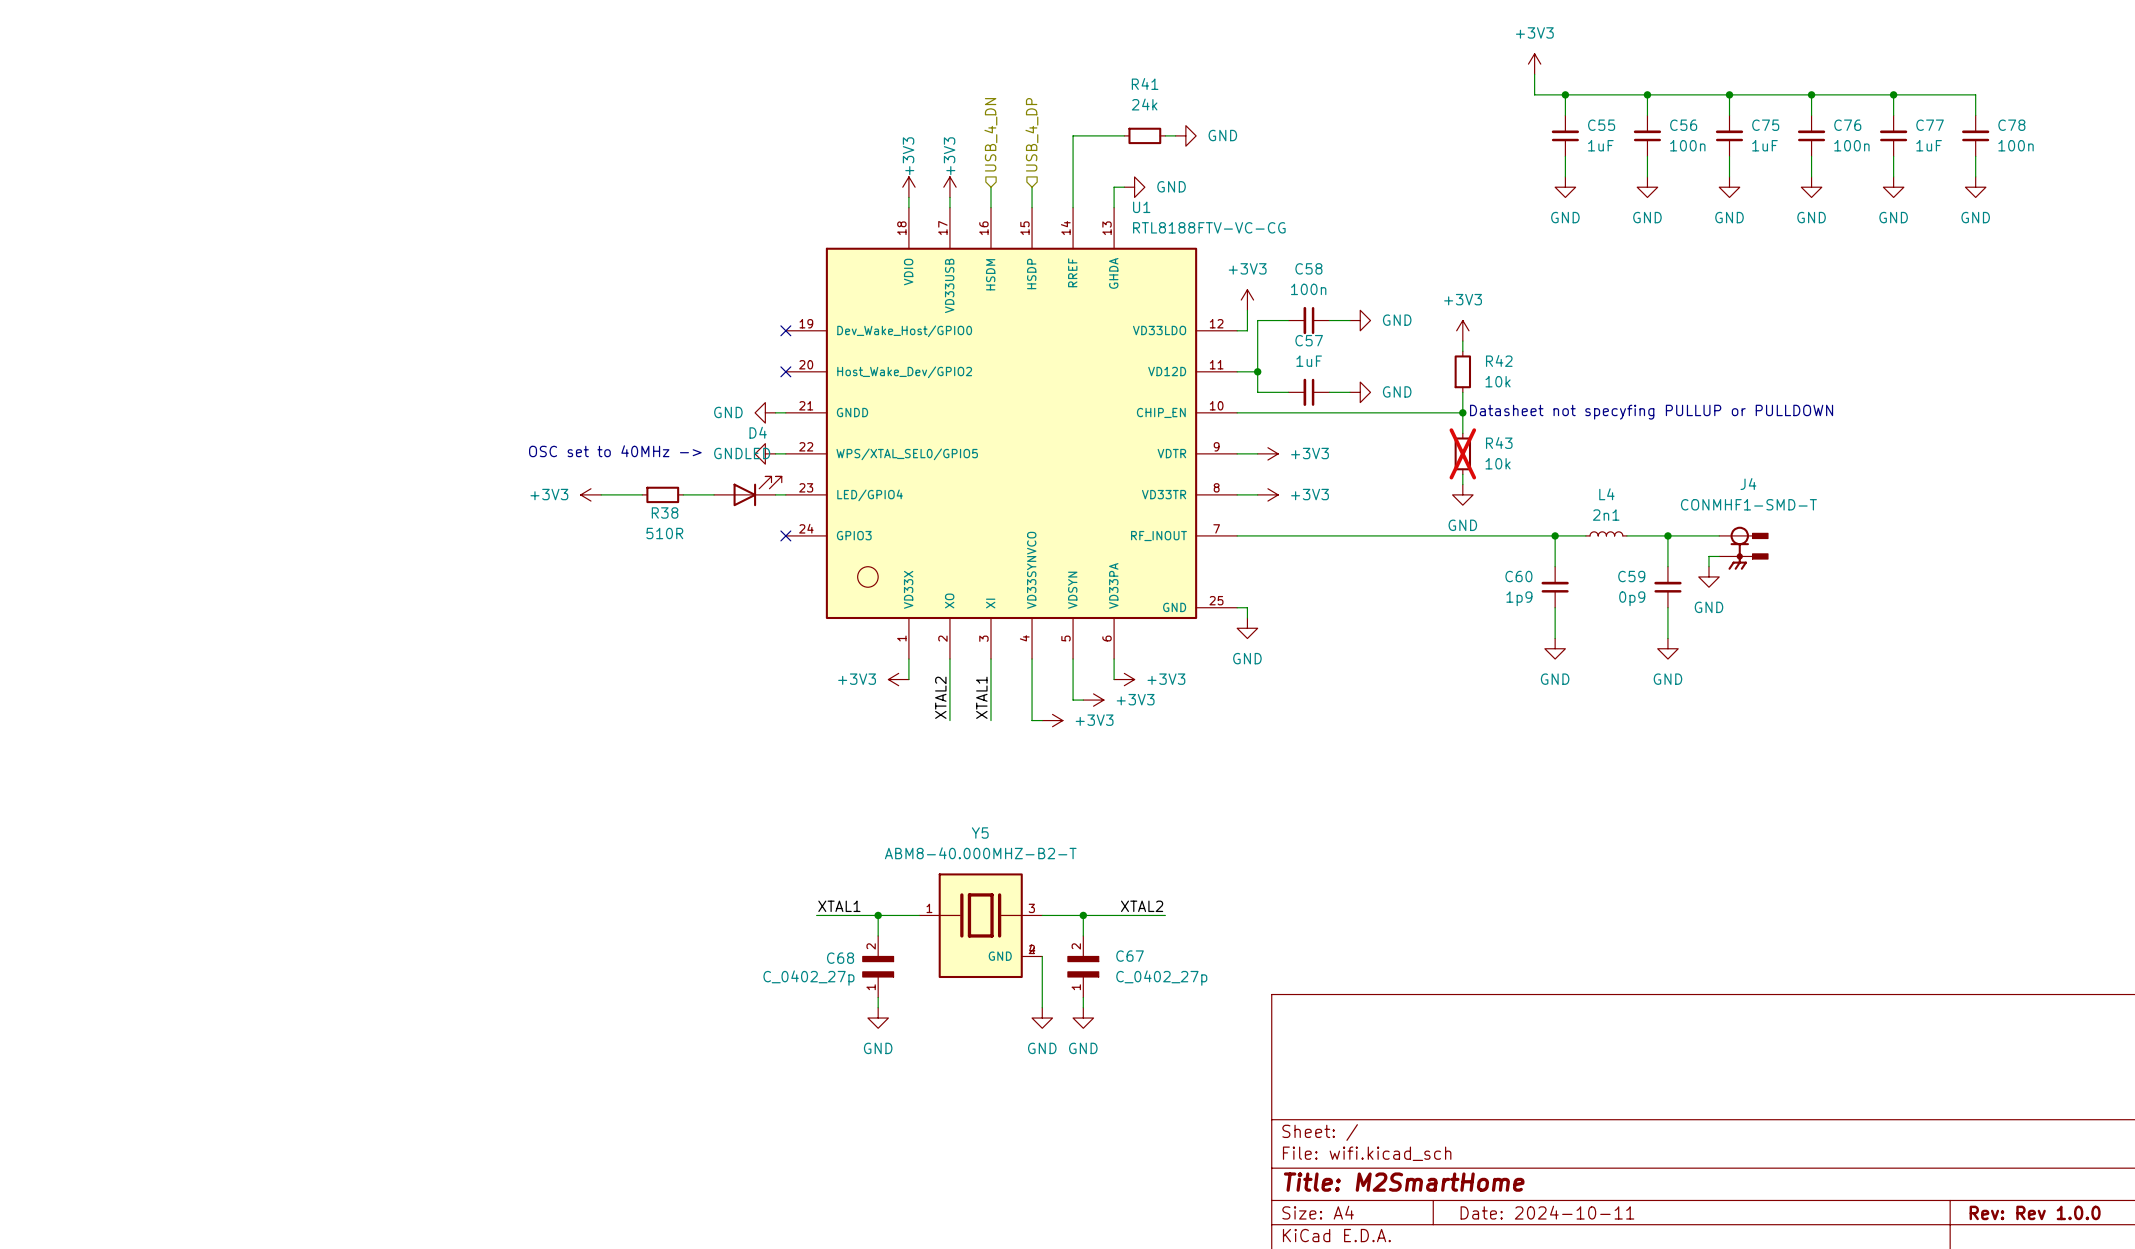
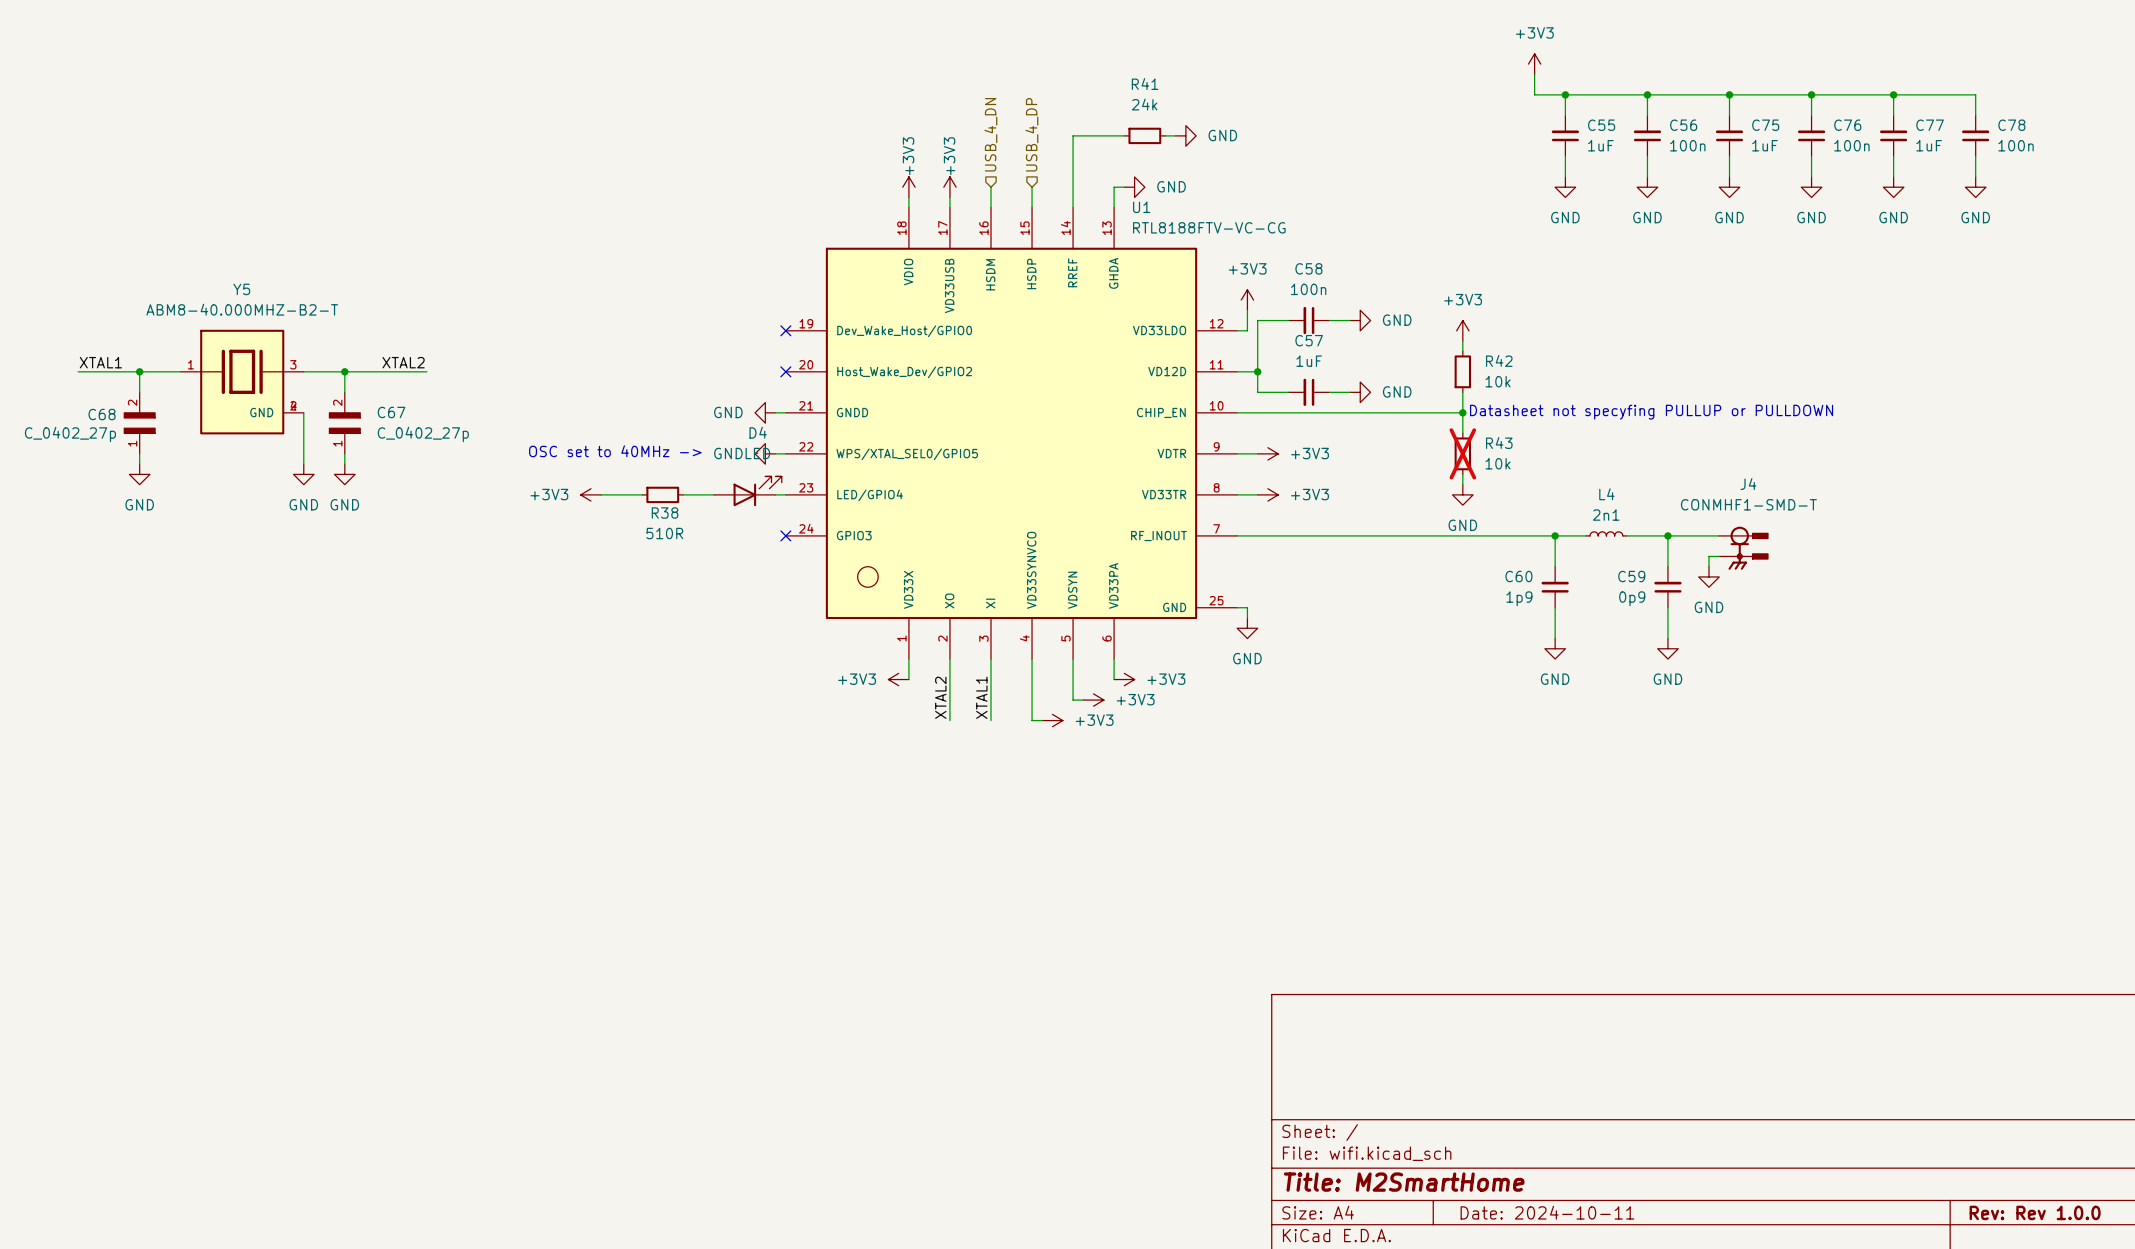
label: none -> XTAL1 (100, 362)
label: none -> XTAL2 (403, 362)
wire: none -> (78, 371) (180, 371)
wire: none -> (139, 371) (139, 392)
junction: none -> (139, 371)
wire: none -> (303, 371) (426, 371)
wire: none -> (344, 371) (344, 392)
junction: none -> (344, 371)
wire: none -> (303, 412) (303, 464)
wire: none -> (139, 453) (139, 464)
wire: none -> (344, 453) (344, 464)
power symbol: none -> GND (139, 474)
power symbol: none -> GND (303, 474)
power symbol: none -> GND (344, 474)
label: XTAL1 (839, 906) -> none
label: XTAL2 (1142, 906) -> none
wire: (816, 915) (919, 915) -> none
wire: (878, 915) (878, 935) -> none
junction: (878, 915) -> none
wire: (1042, 915) (1165, 915) -> none
wire: (1083, 915) (1083, 935) -> none
junction: (1083, 915) -> none
Y5 position: (980, 925) -> (242, 382)
wire: (1042, 956) (1042, 1007) -> none
C68 position: (878, 966) -> (139, 423)
C67 position: (1083, 966) -> (344, 423)
wire: (878, 997) (878, 1007) -> none
wire: (1083, 997) (1083, 1007) -> none
power symbol: GND (878, 1018) -> none
power symbol: GND (1042, 1018) -> none
power symbol: GND (1083, 1018) -> none

